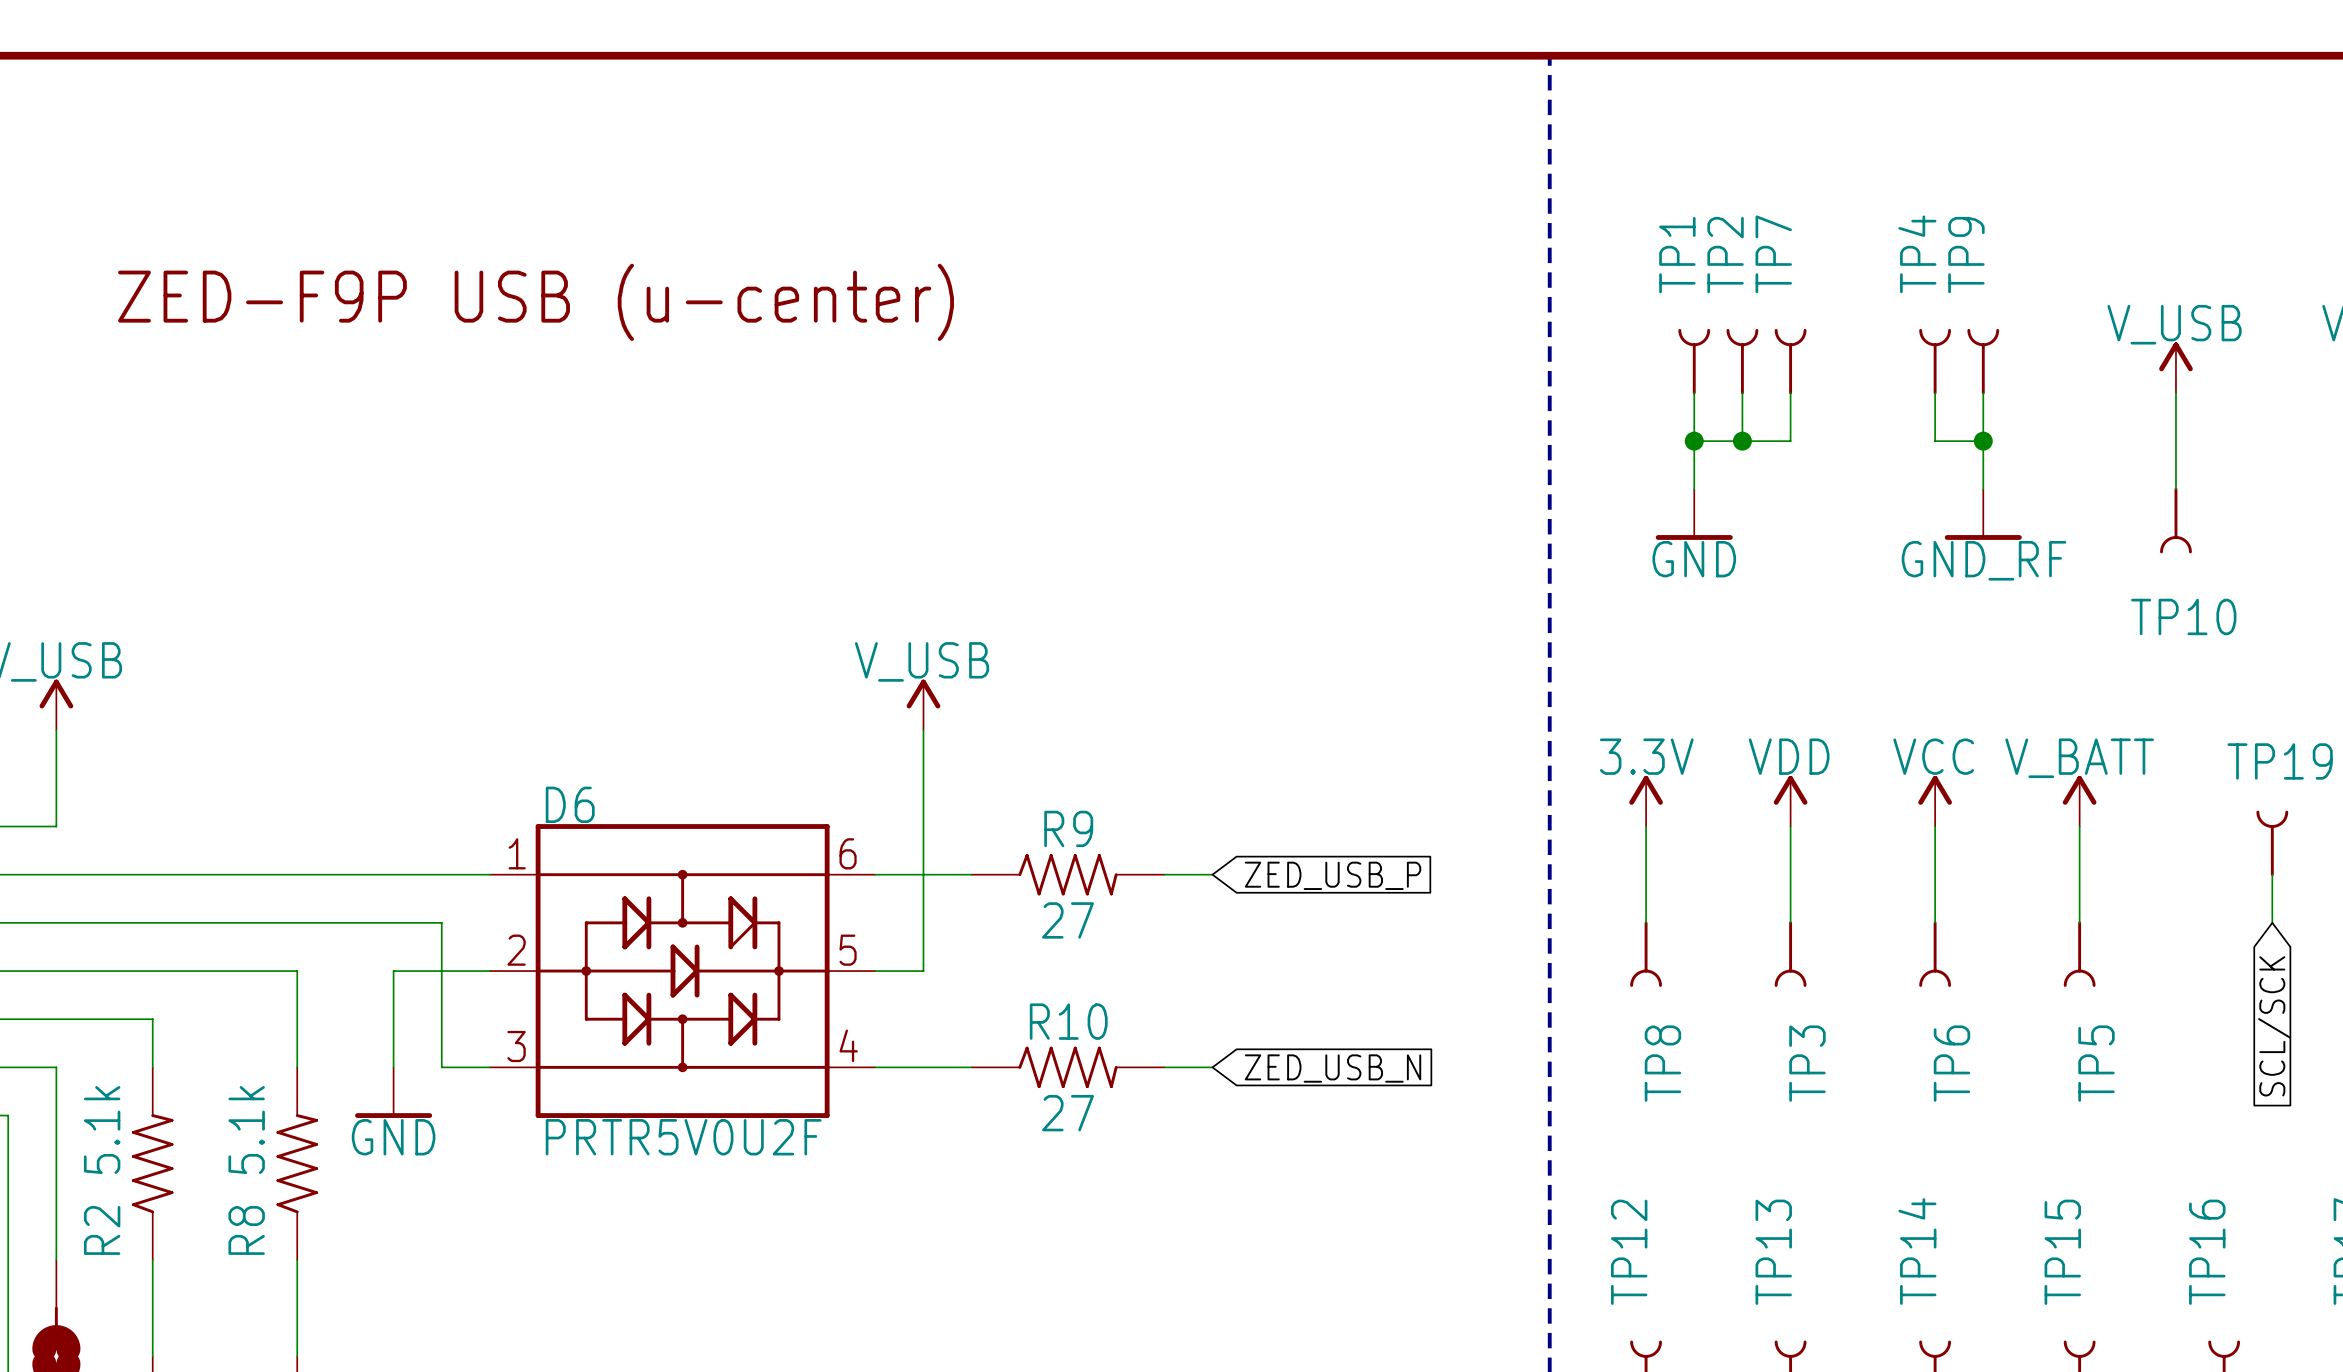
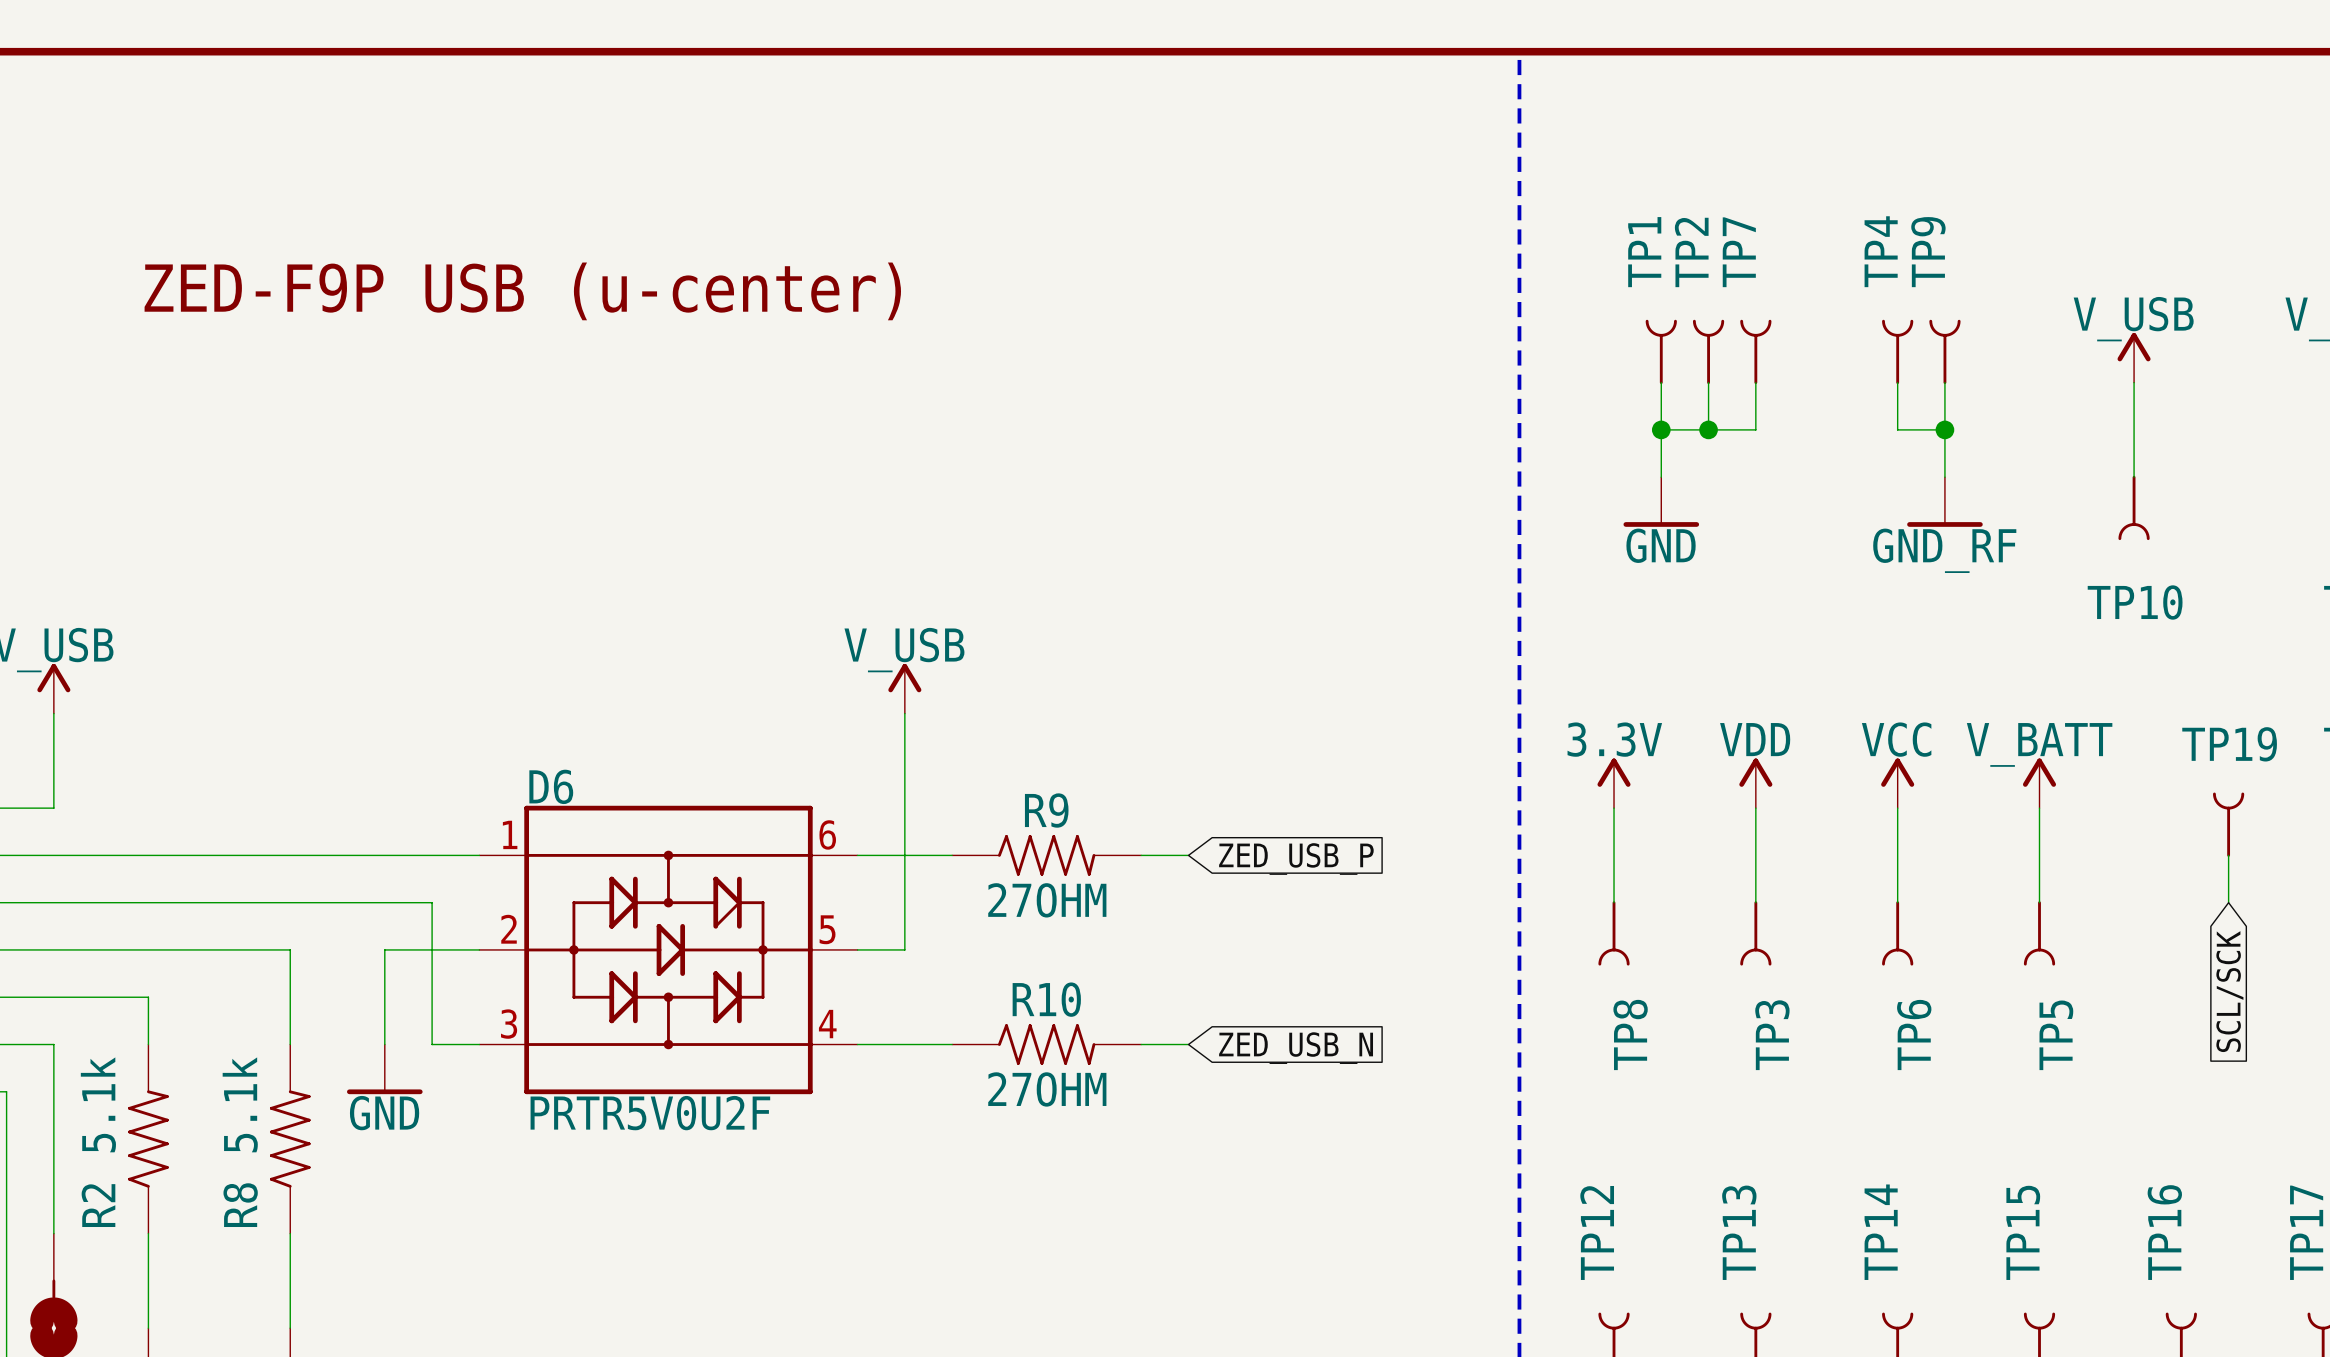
R9 value: 27 (1068, 920) -> 27OHM (1047, 900)
R10 value: 27 (1068, 1113) -> 27OHM (1047, 1089)

